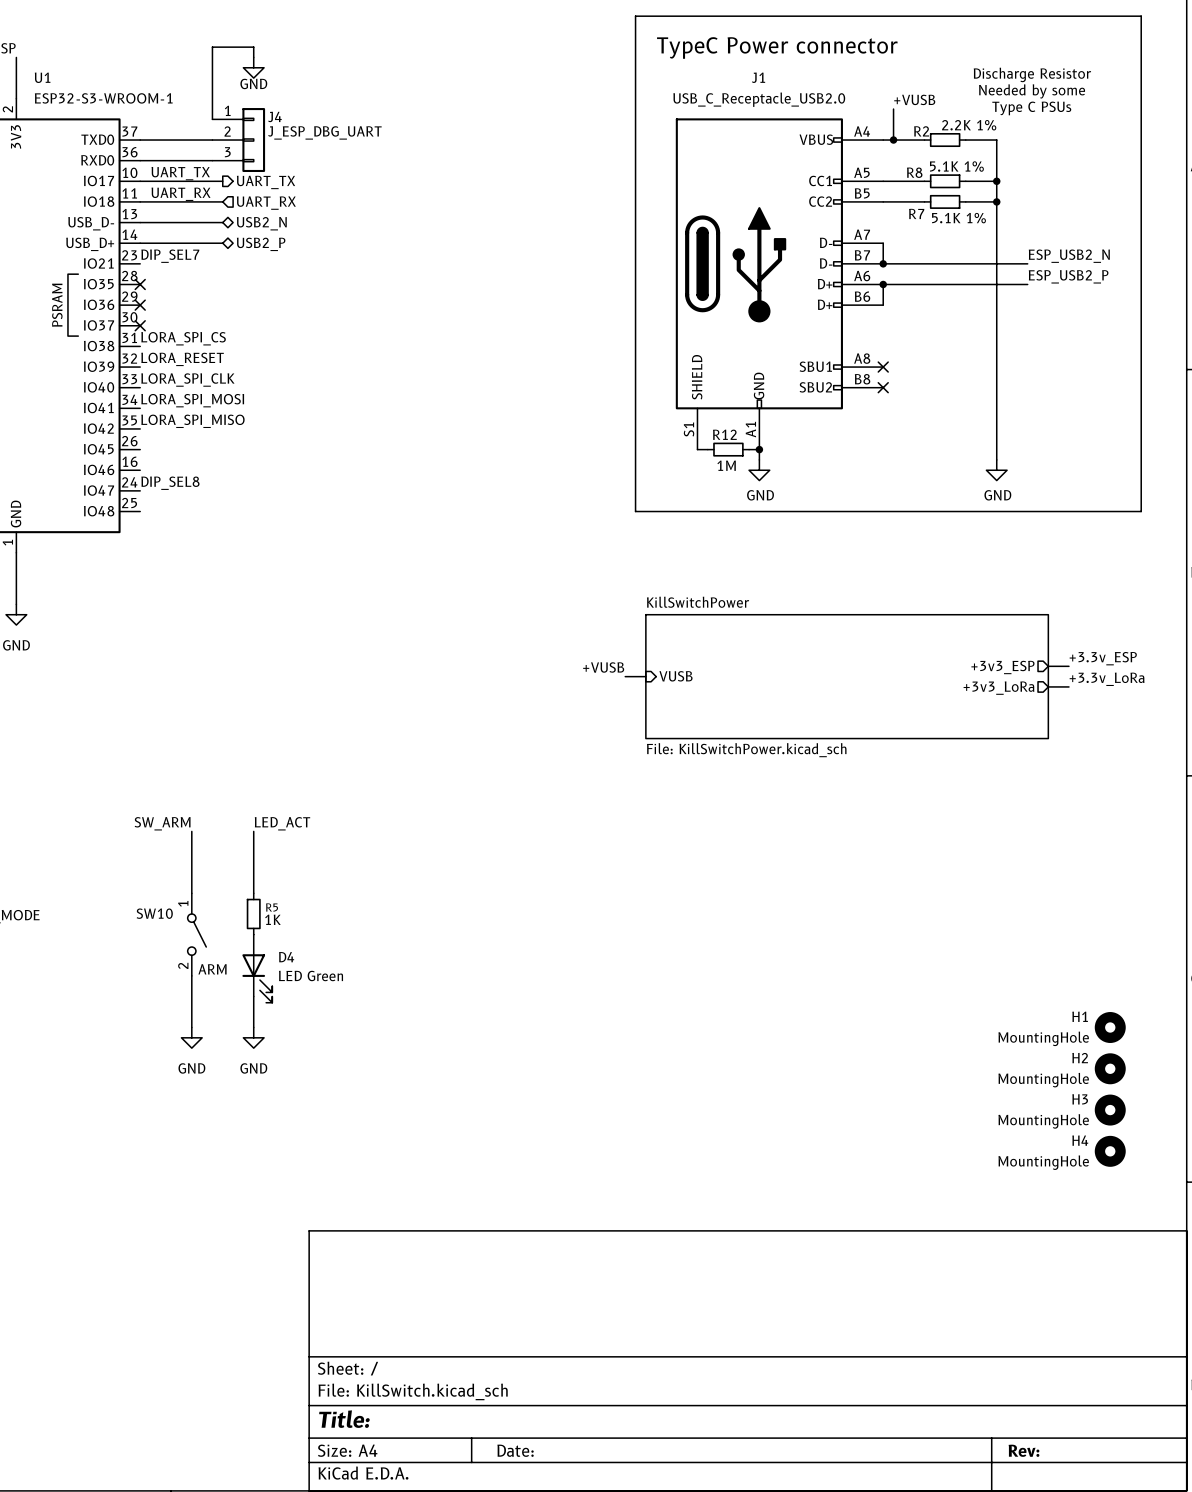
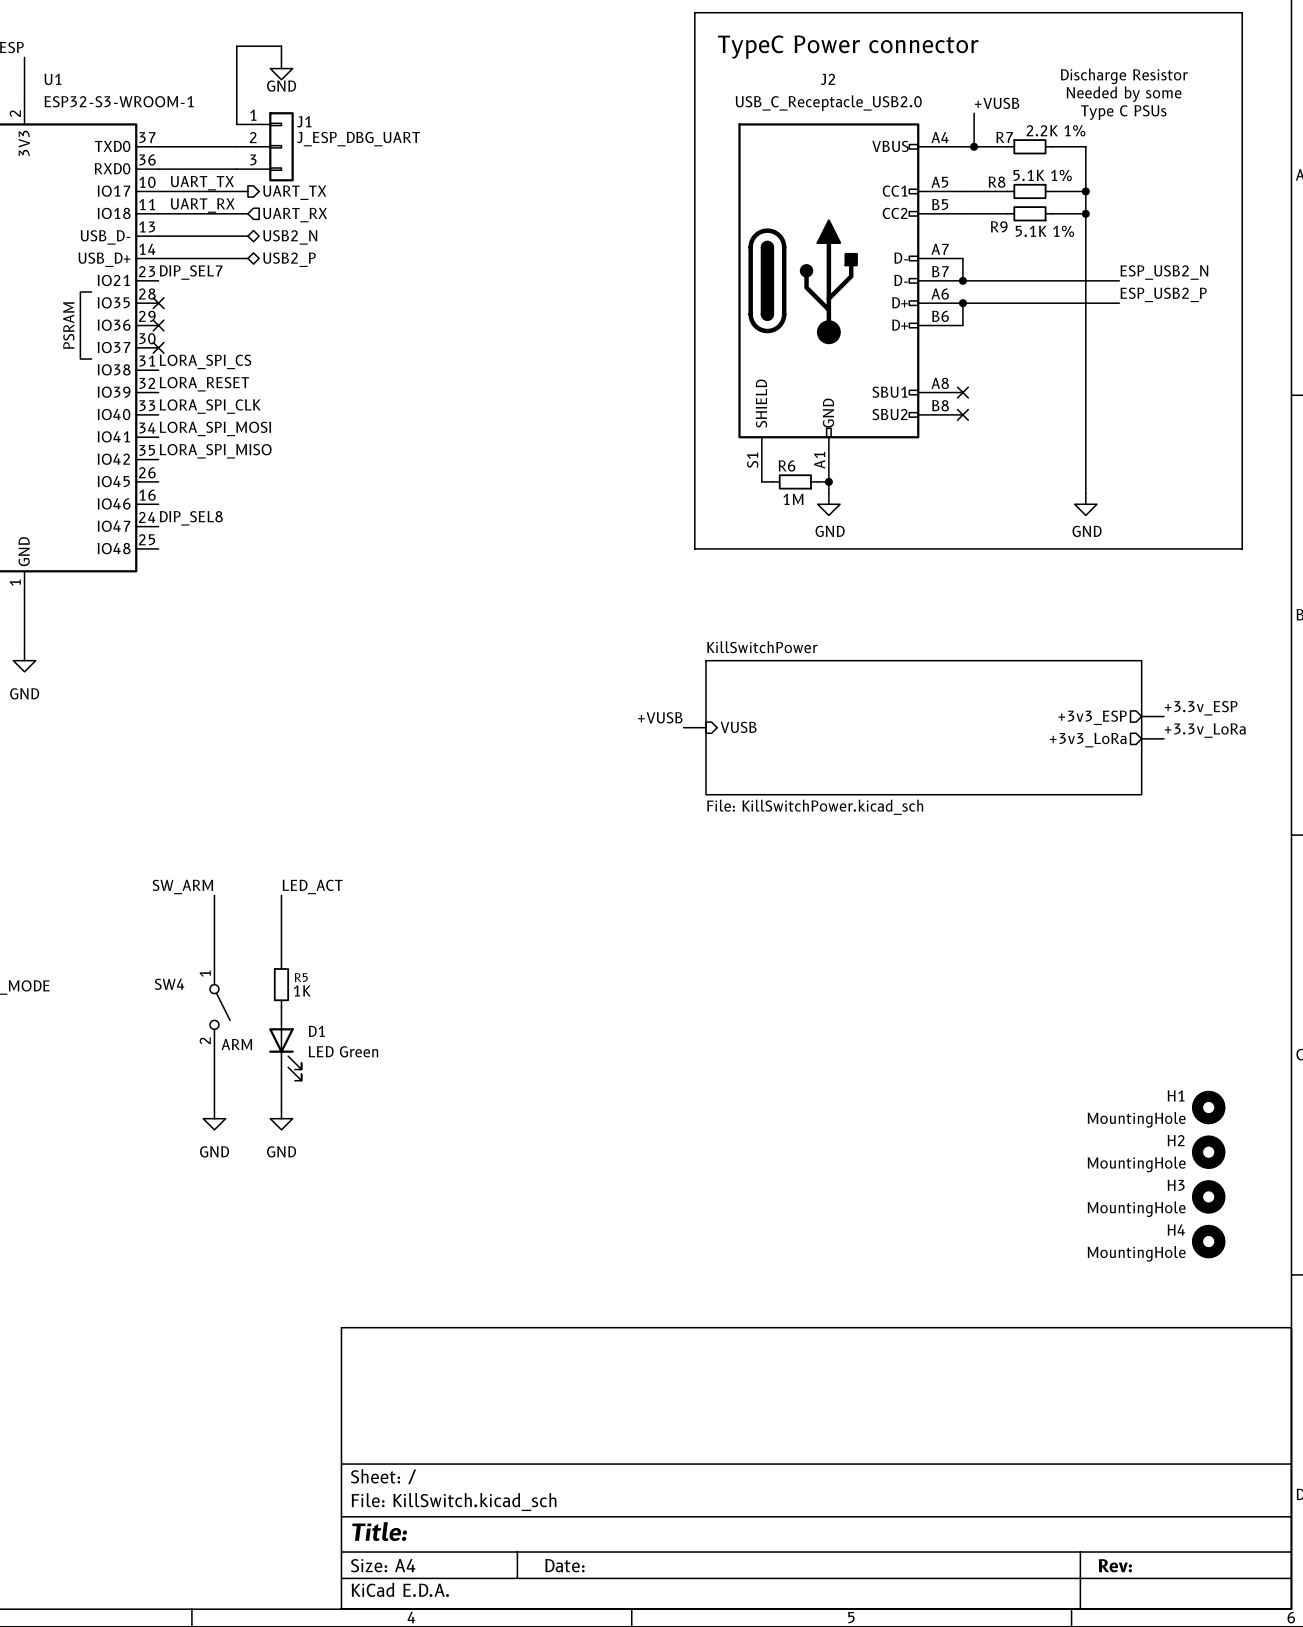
J1 name: J1 (758, 77) -> J2 (827, 79)
J4 name: J4 (274, 116) -> J1 (304, 121)
R2 name: R2 (921, 131) -> R7 (1004, 137)
R7 name: R7 (916, 213) -> R9 (999, 226)
R12 name: R12 (724, 434) -> R6 (786, 465)
SW10 name: SW10 (154, 913) -> SW4 (169, 984)
D4 name: D4 (286, 957) -> D1 (316, 1031)

